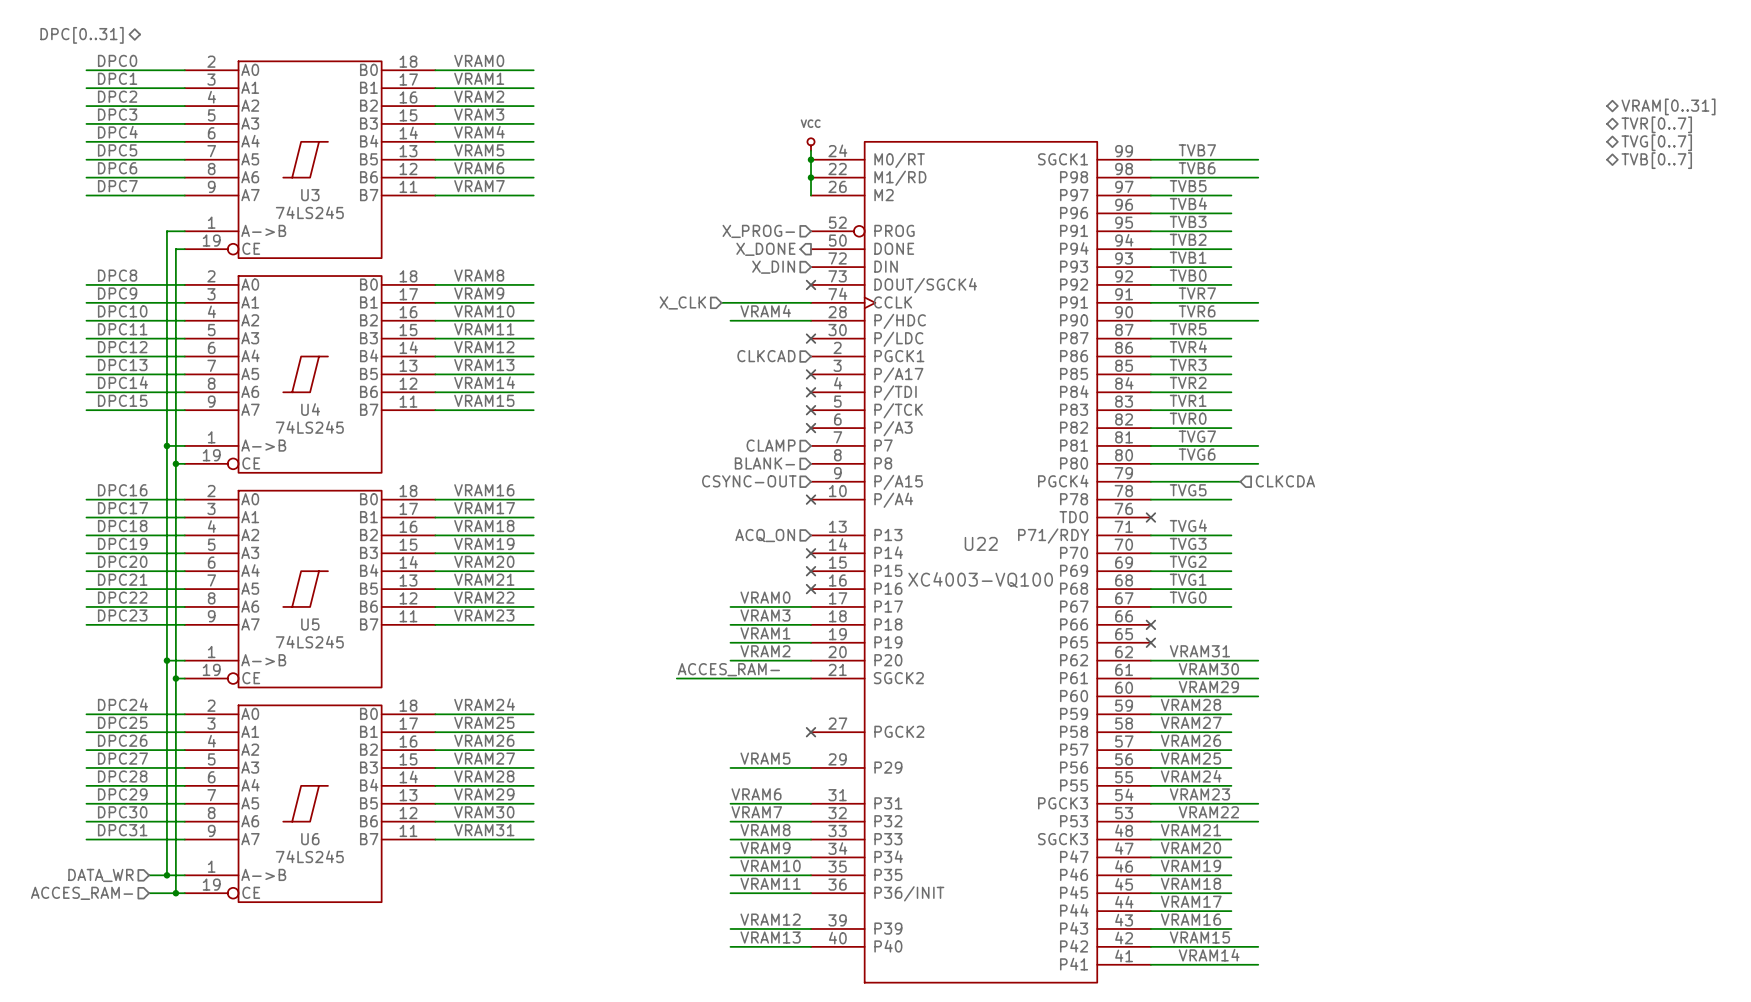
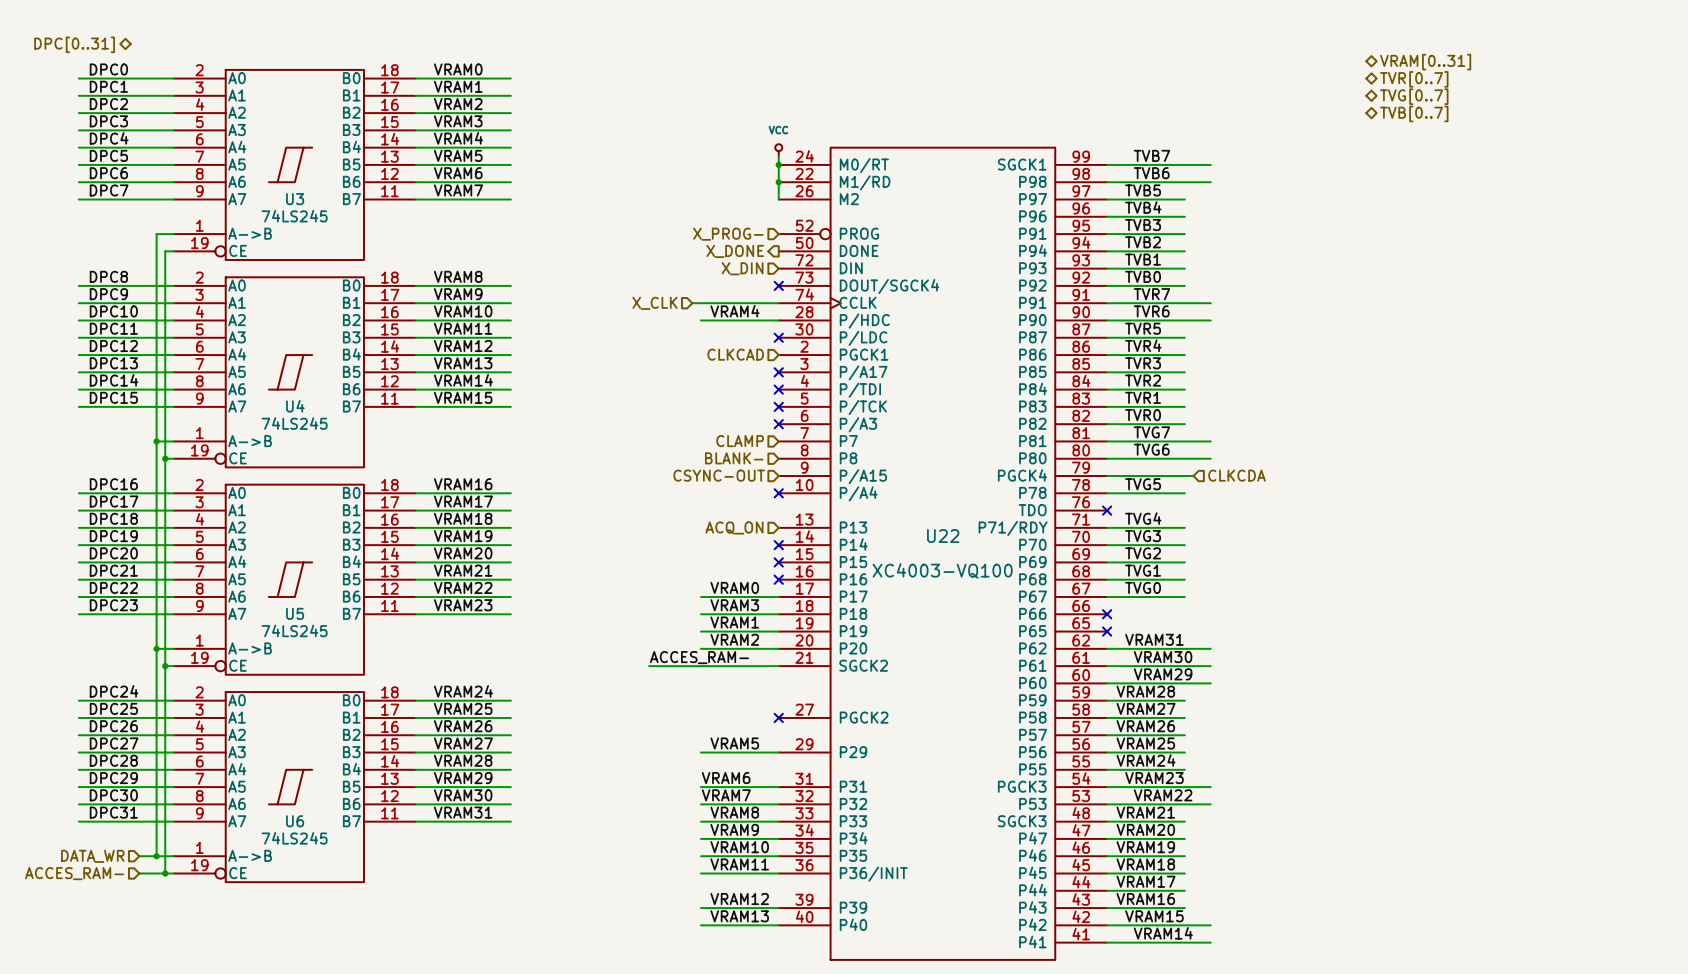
hierarchical label: none -> VRAM[0..31] (1425, 62)
hierarchical label: none -> TVR[0..7] (1414, 79)
hierarchical label: none -> TVG[0..7] (1414, 96)
hierarchical label: none -> TVB[0..7] (1414, 113)
hierarchical label: VRAM[0..31] (1668, 106) -> none
hierarchical label: TVR[0..7] (1656, 124) -> none
hierarchical label: TVG[0..7] (1656, 142) -> none
hierarchical label: TVB[0..7] (1656, 160) -> none

